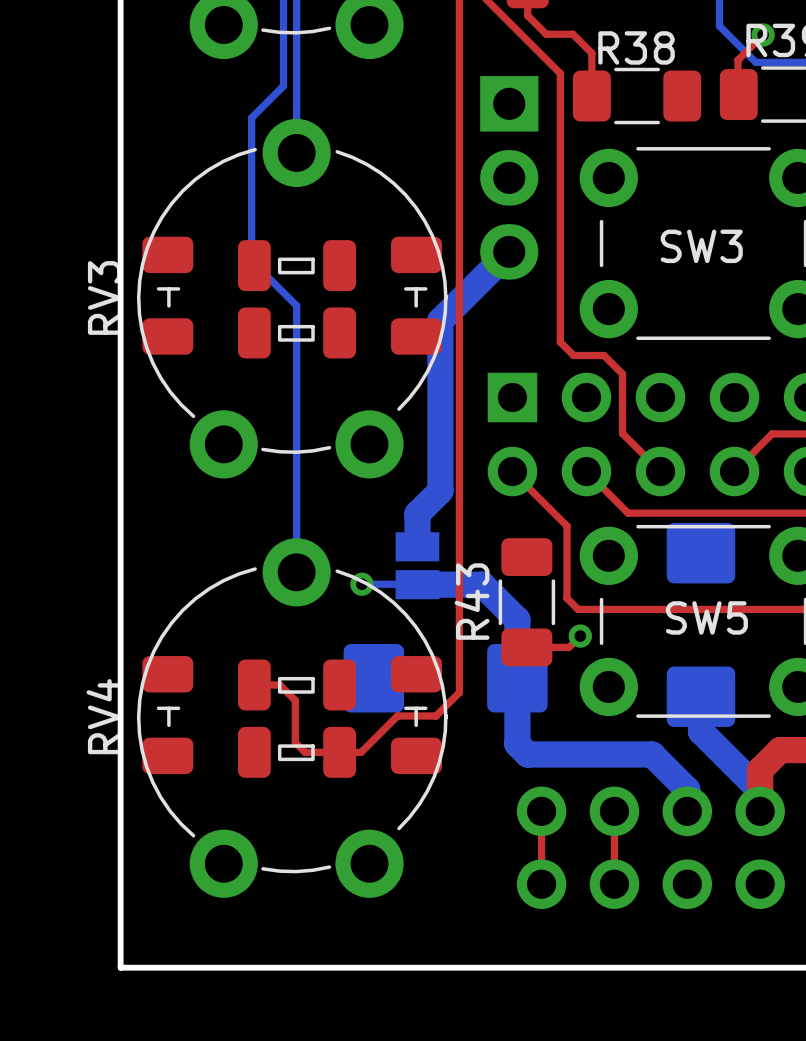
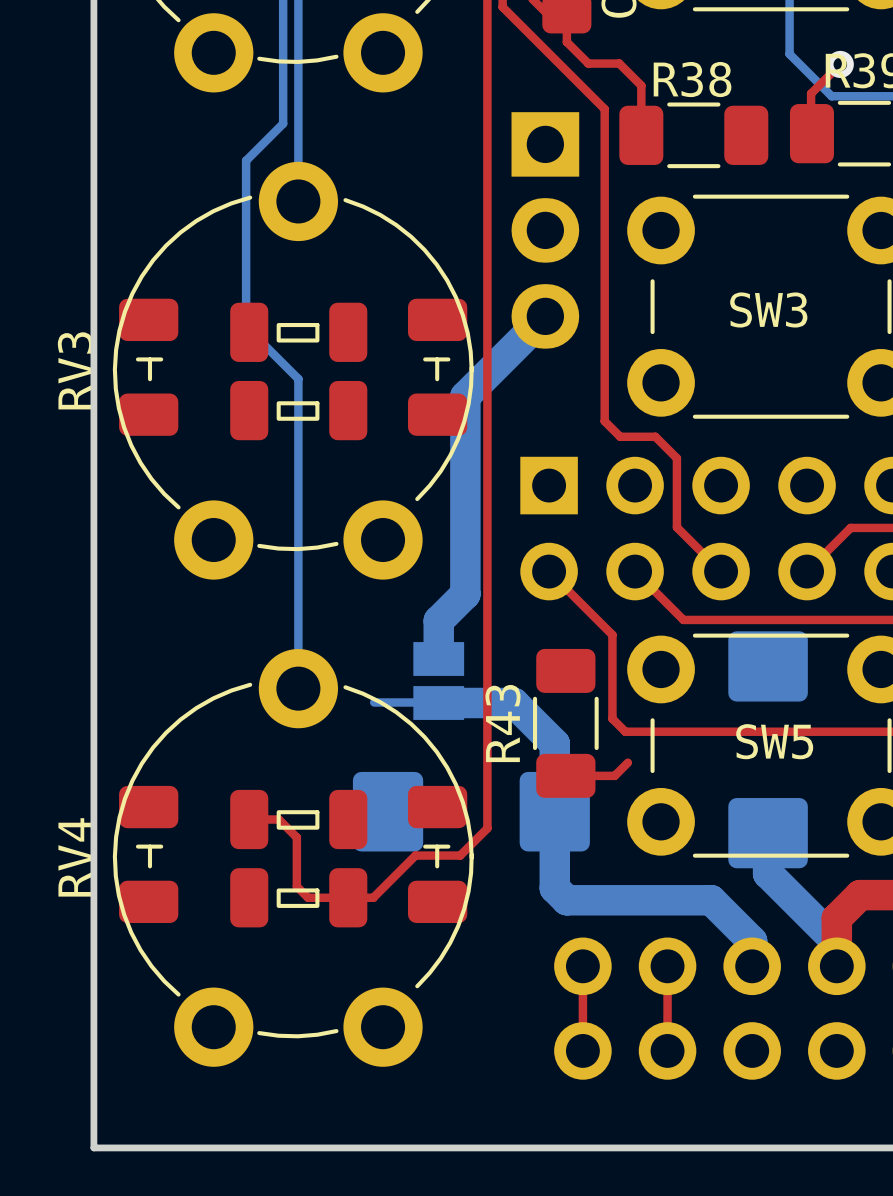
via: (361, 584) -> none
via: (580, 636) -> none

